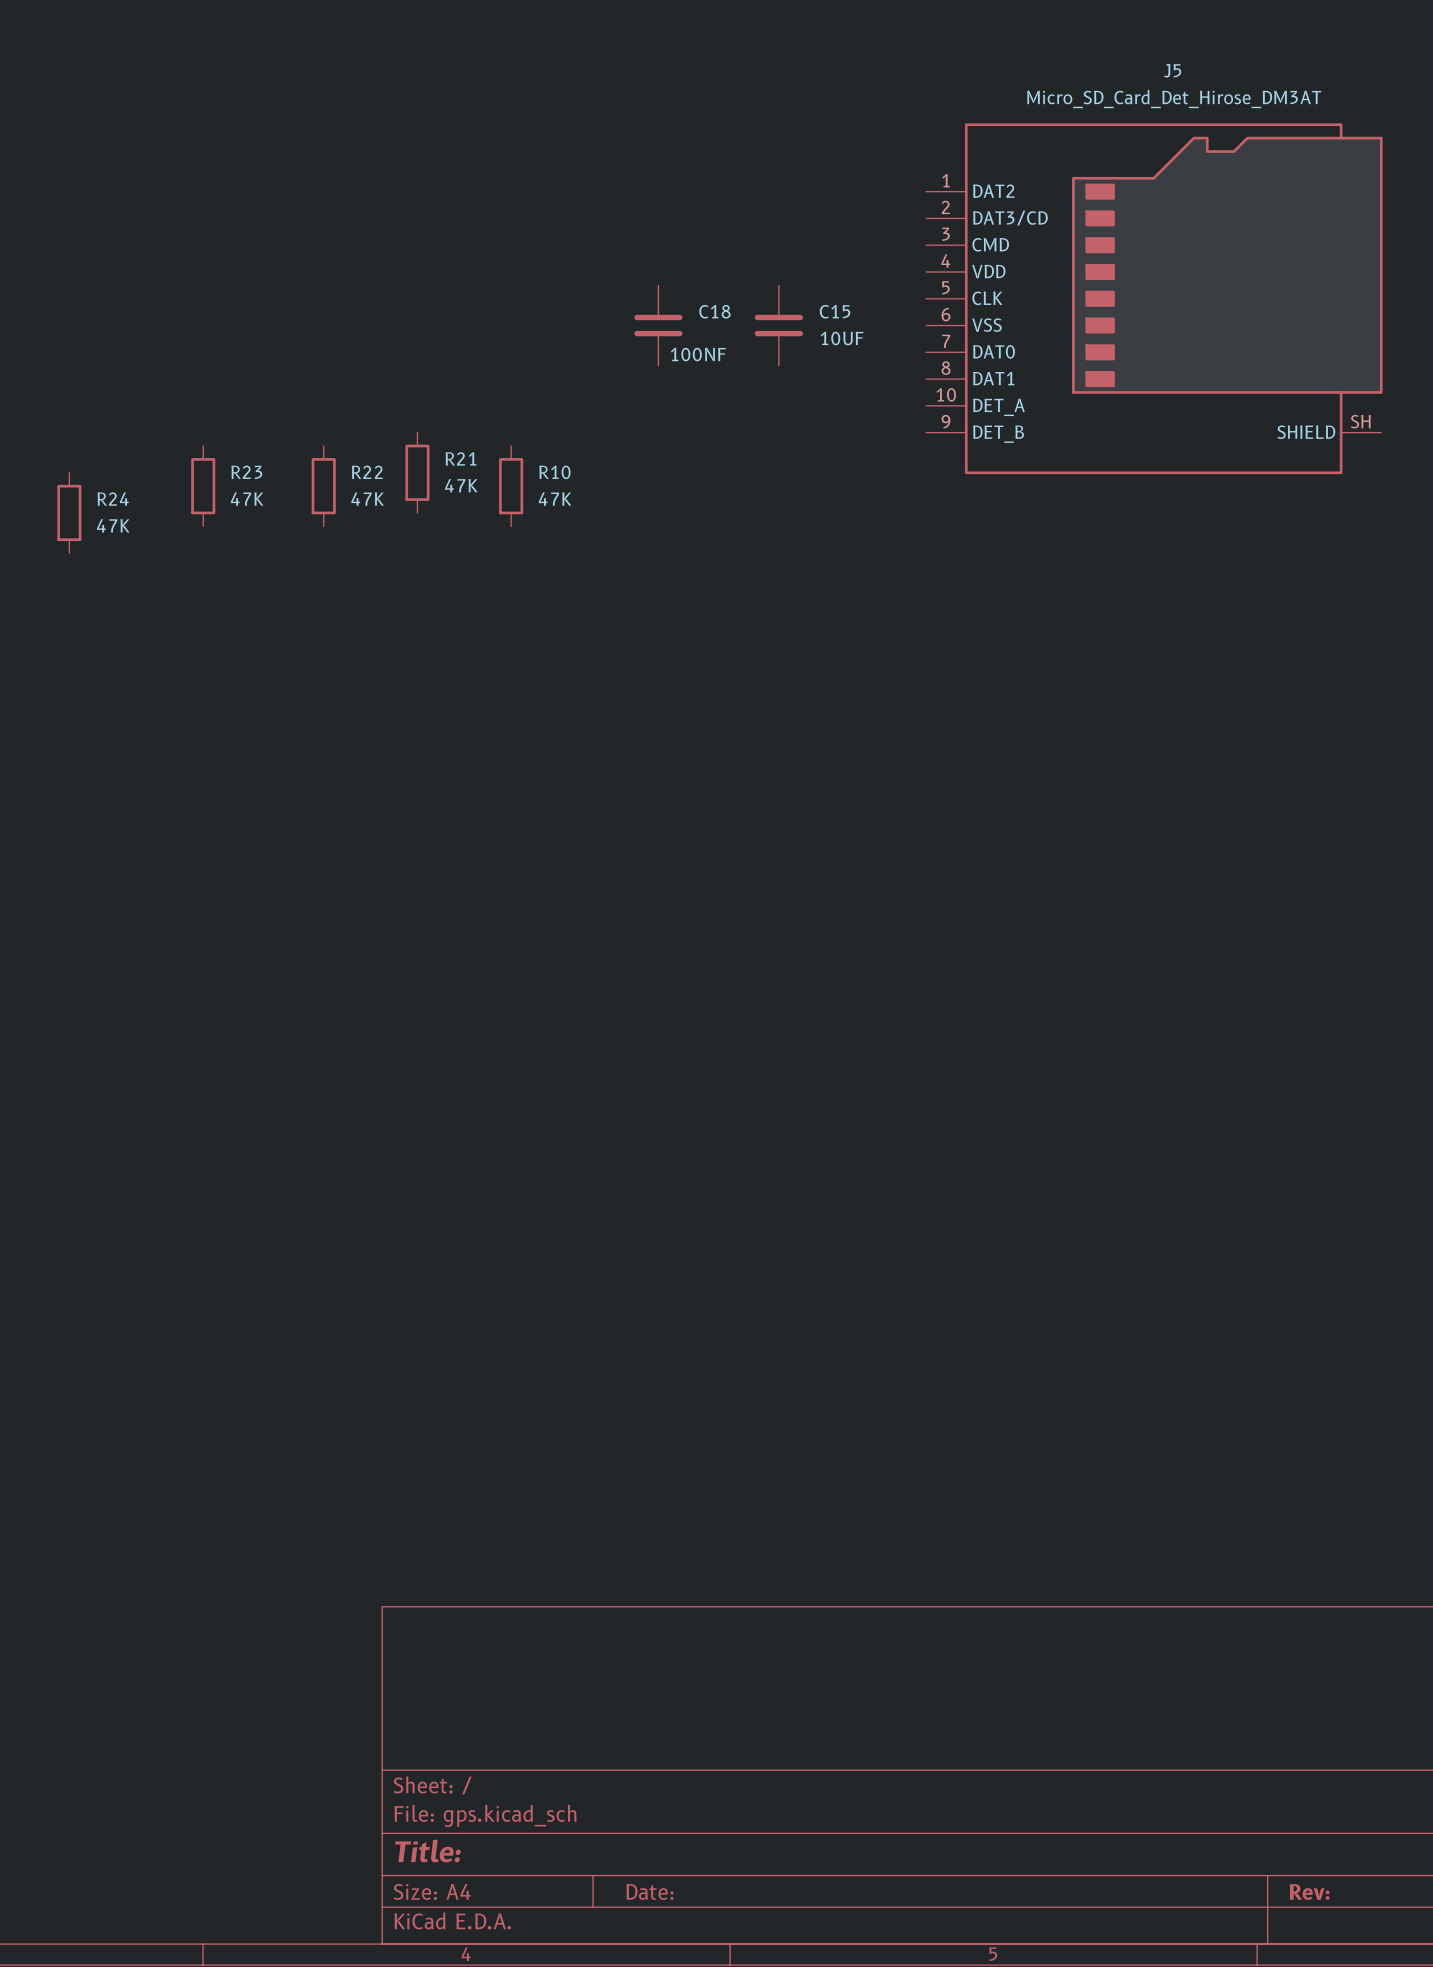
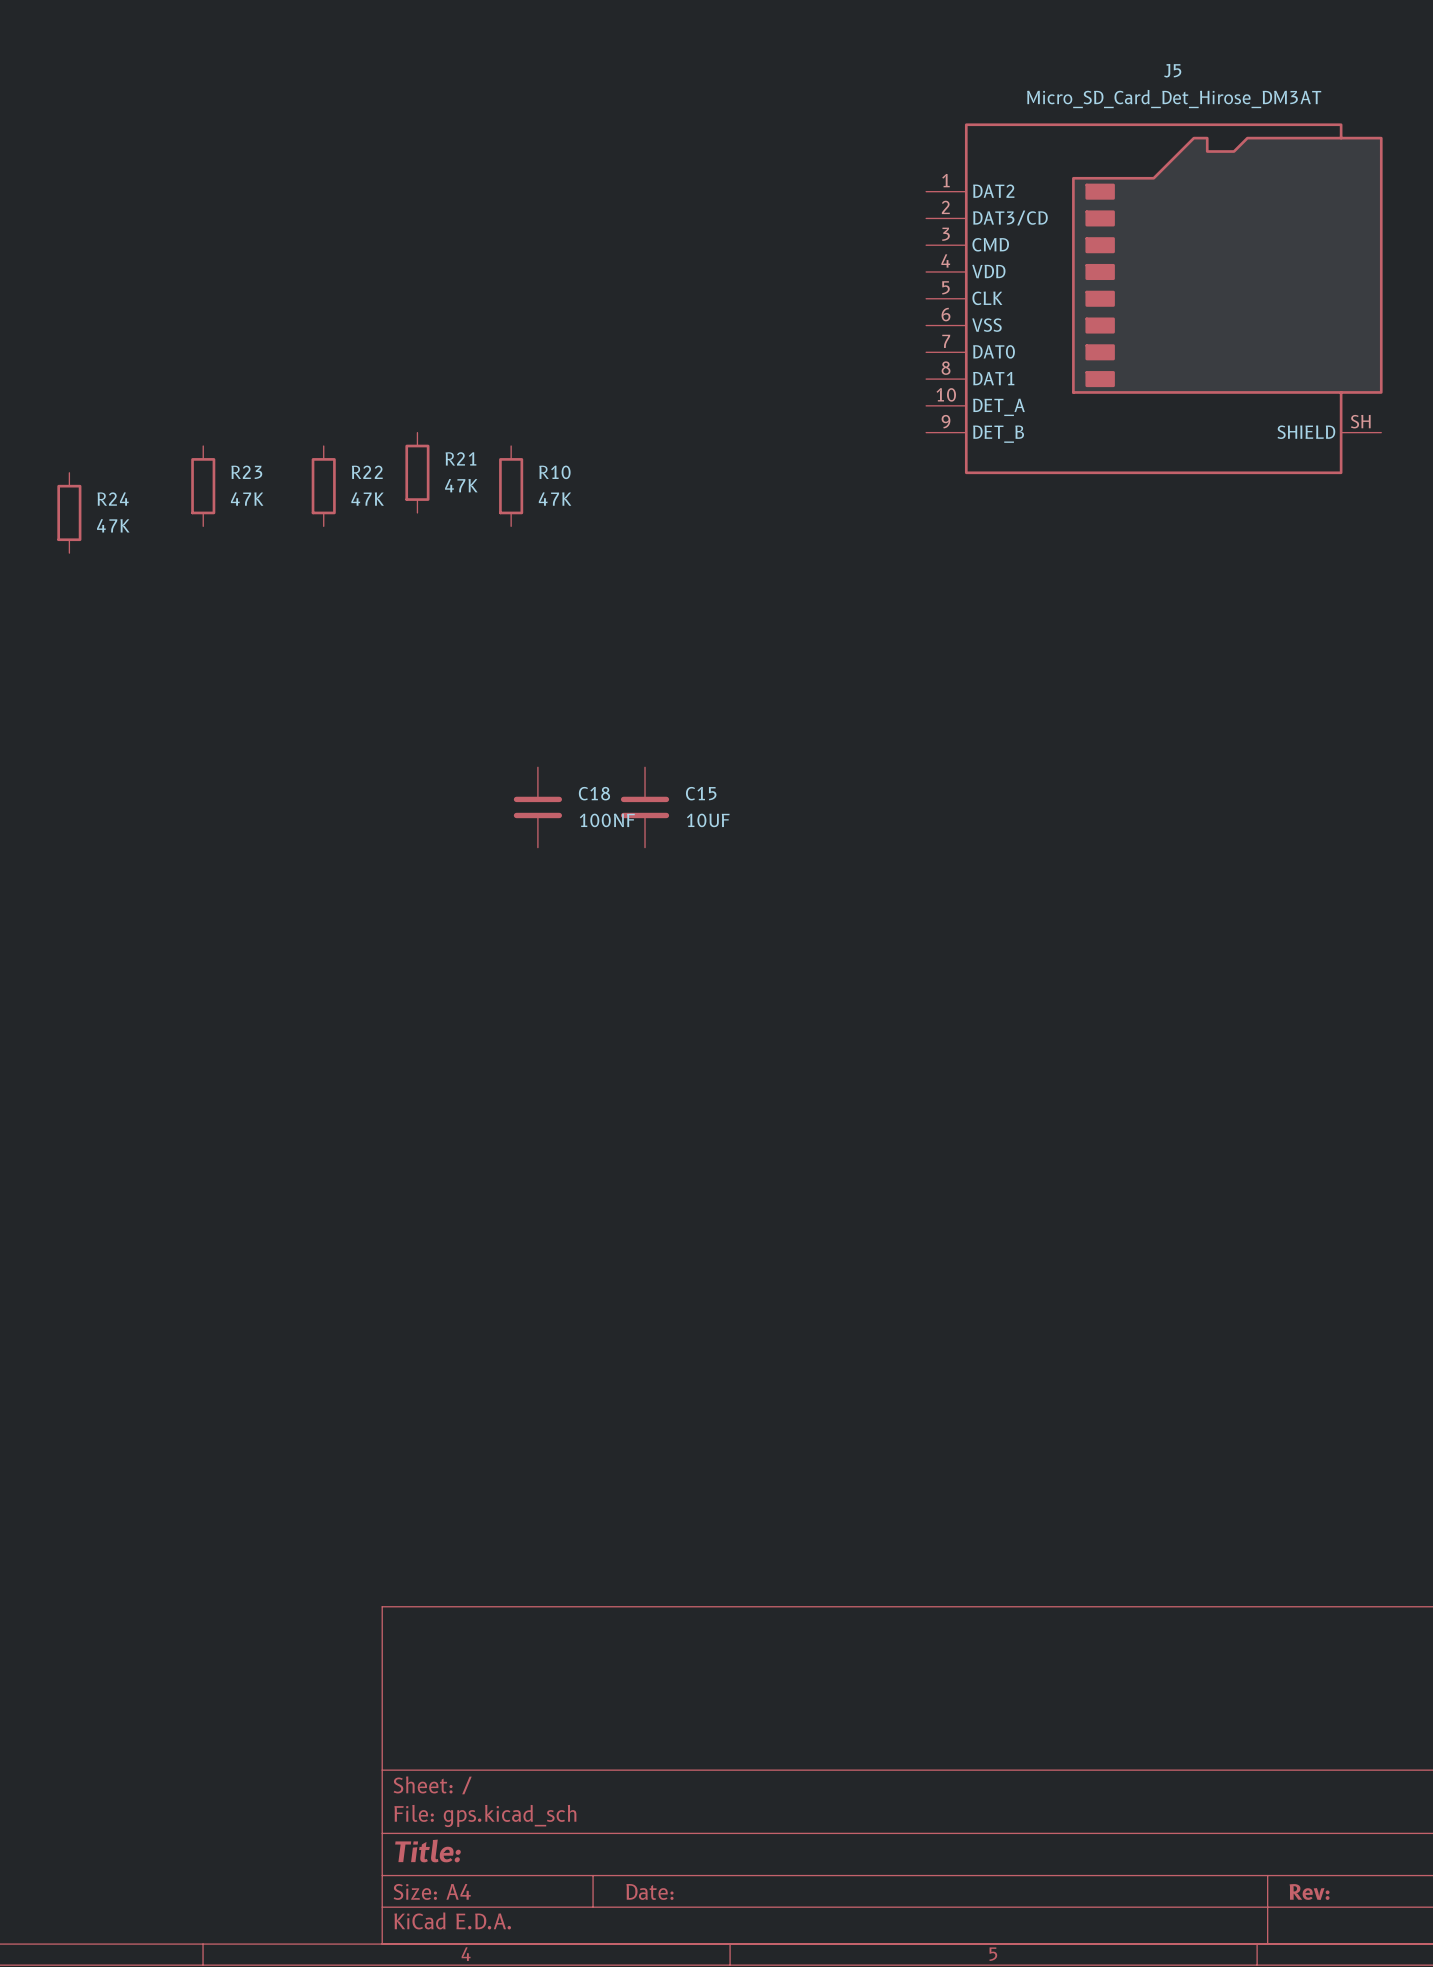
C18 position: (658, 325) -> (537, 807)
C15 position: (778, 325) -> (645, 807)
C18 value position: 100NF (698, 354) -> 100NF (607, 820)

